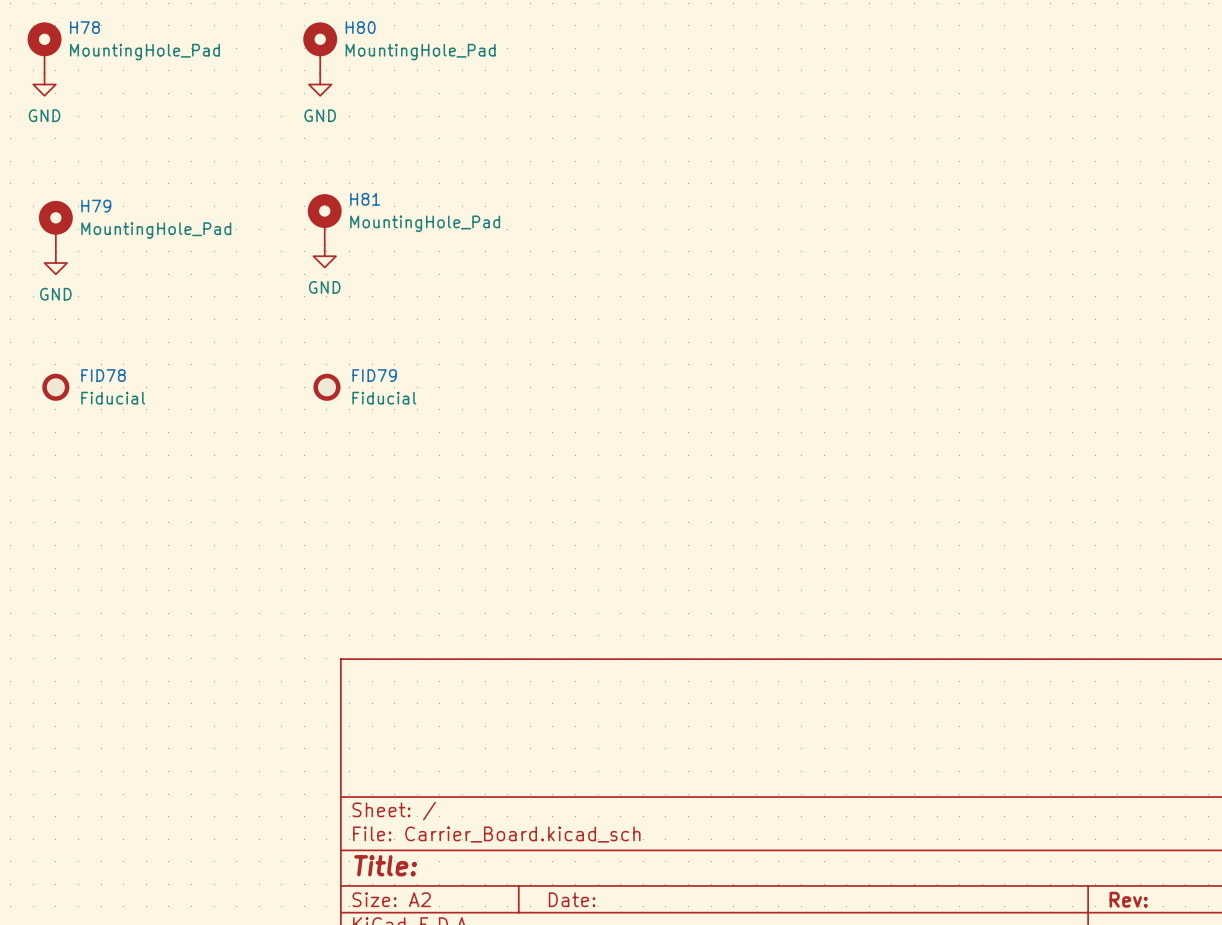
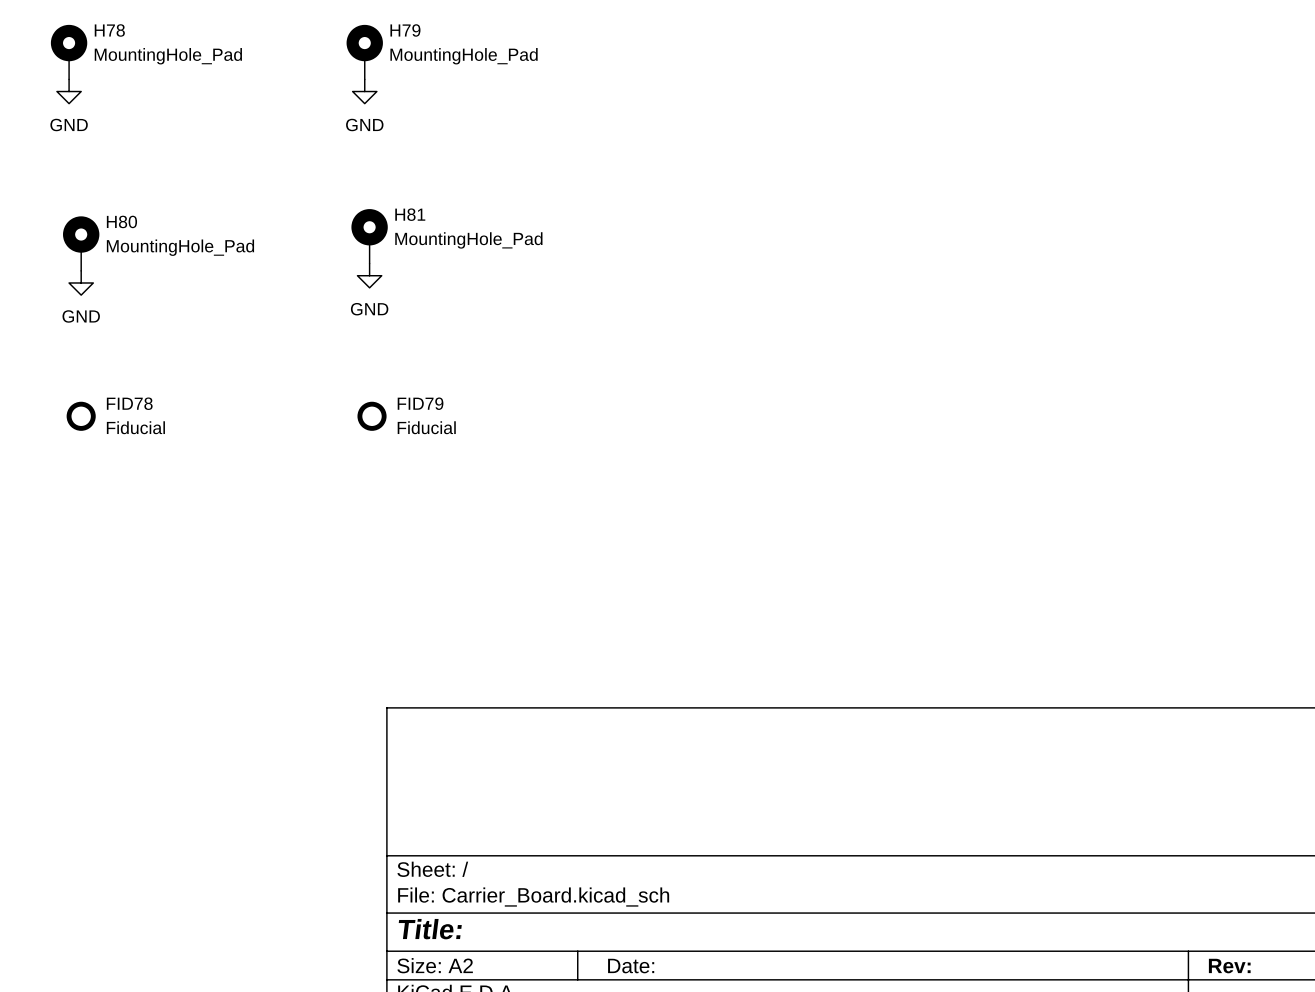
H80 name: H80 (360, 27) -> H79 (405, 30)
H79 name: H79 (96, 206) -> H80 (121, 221)

